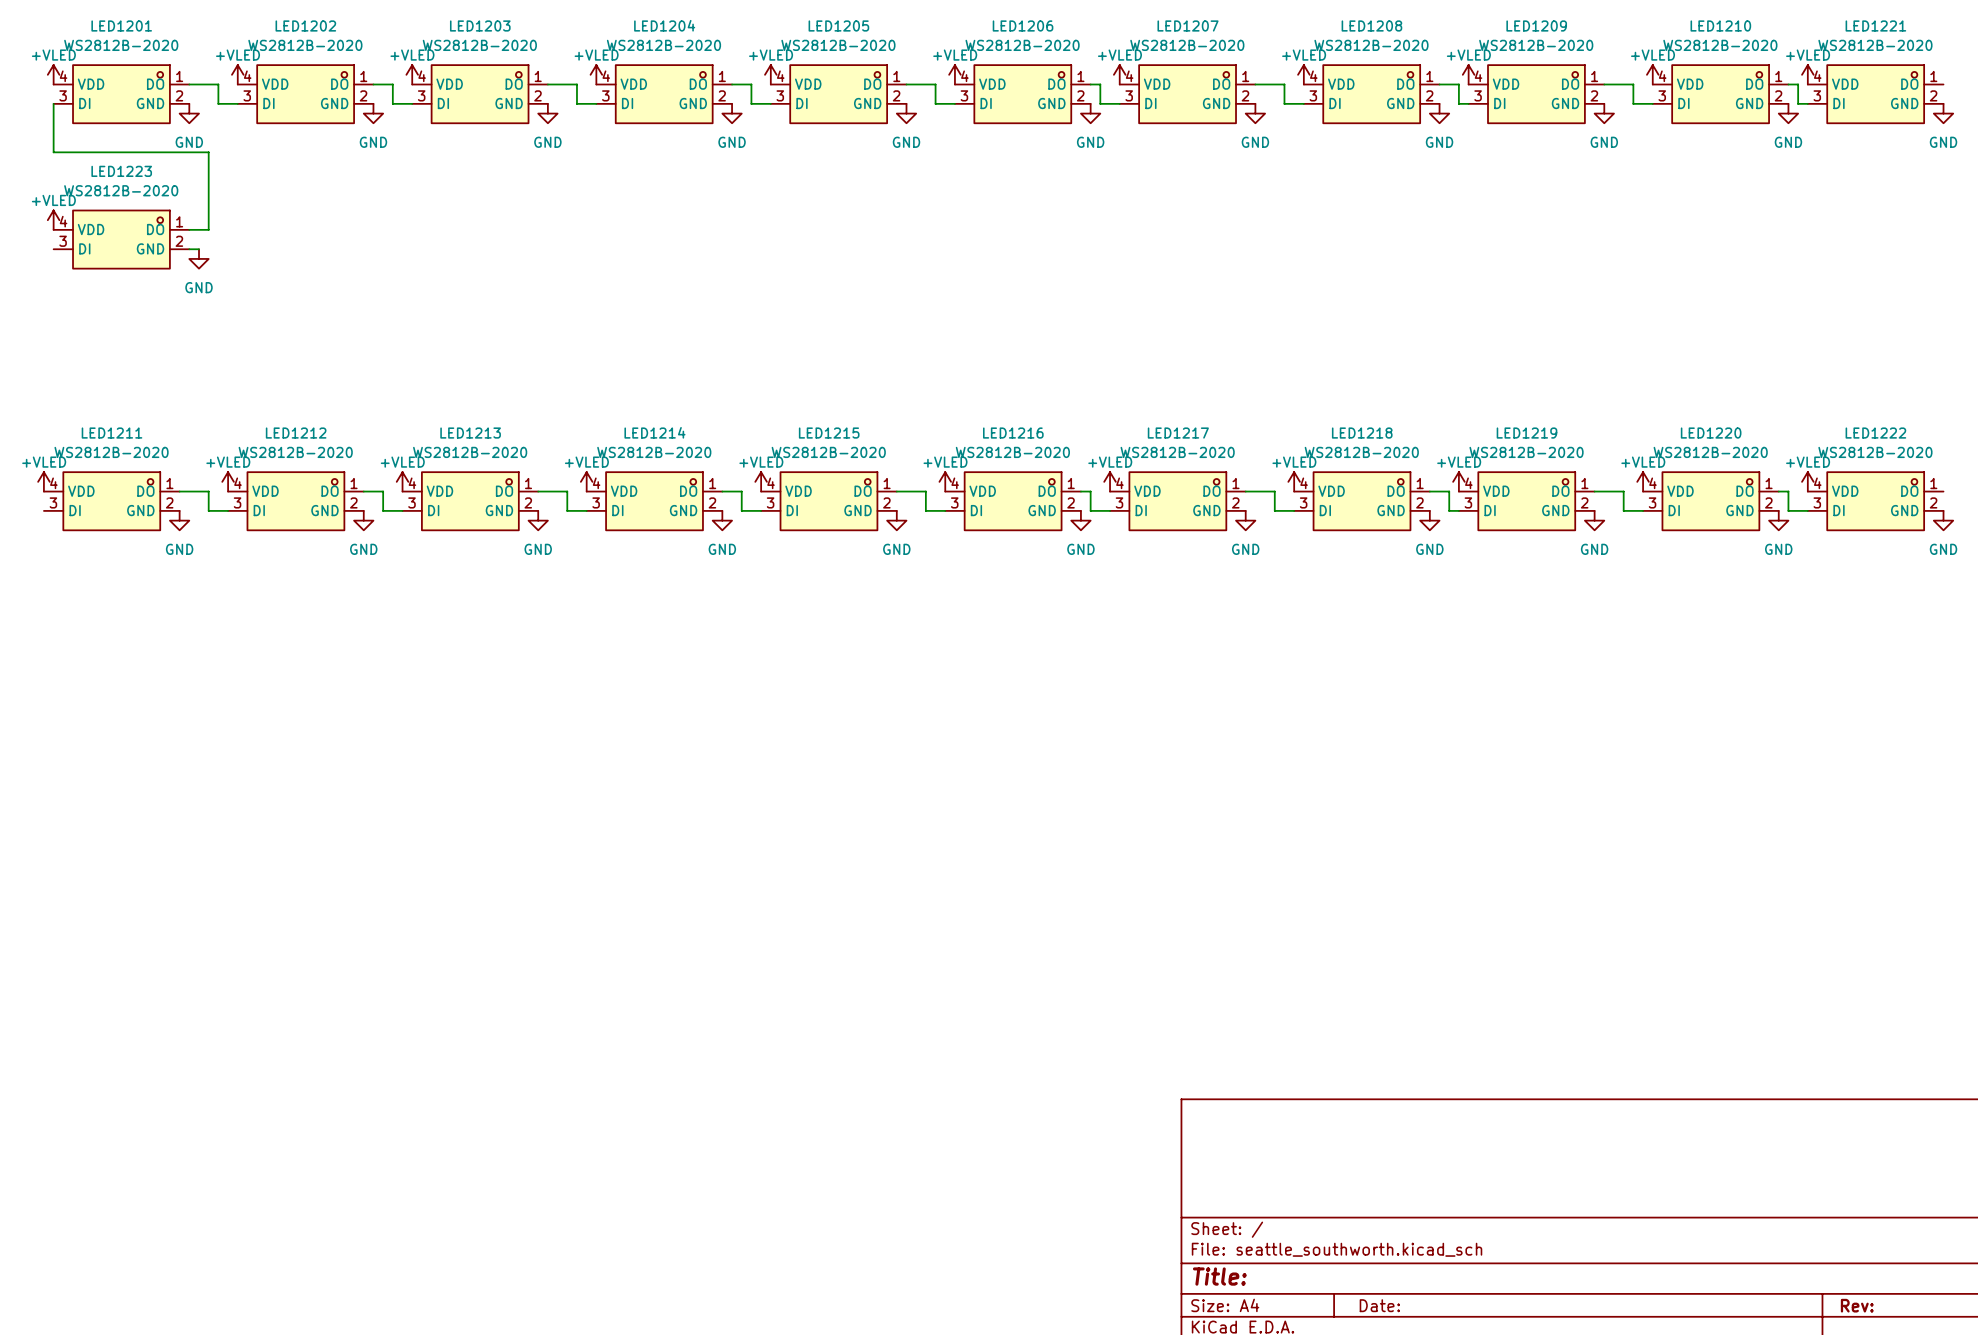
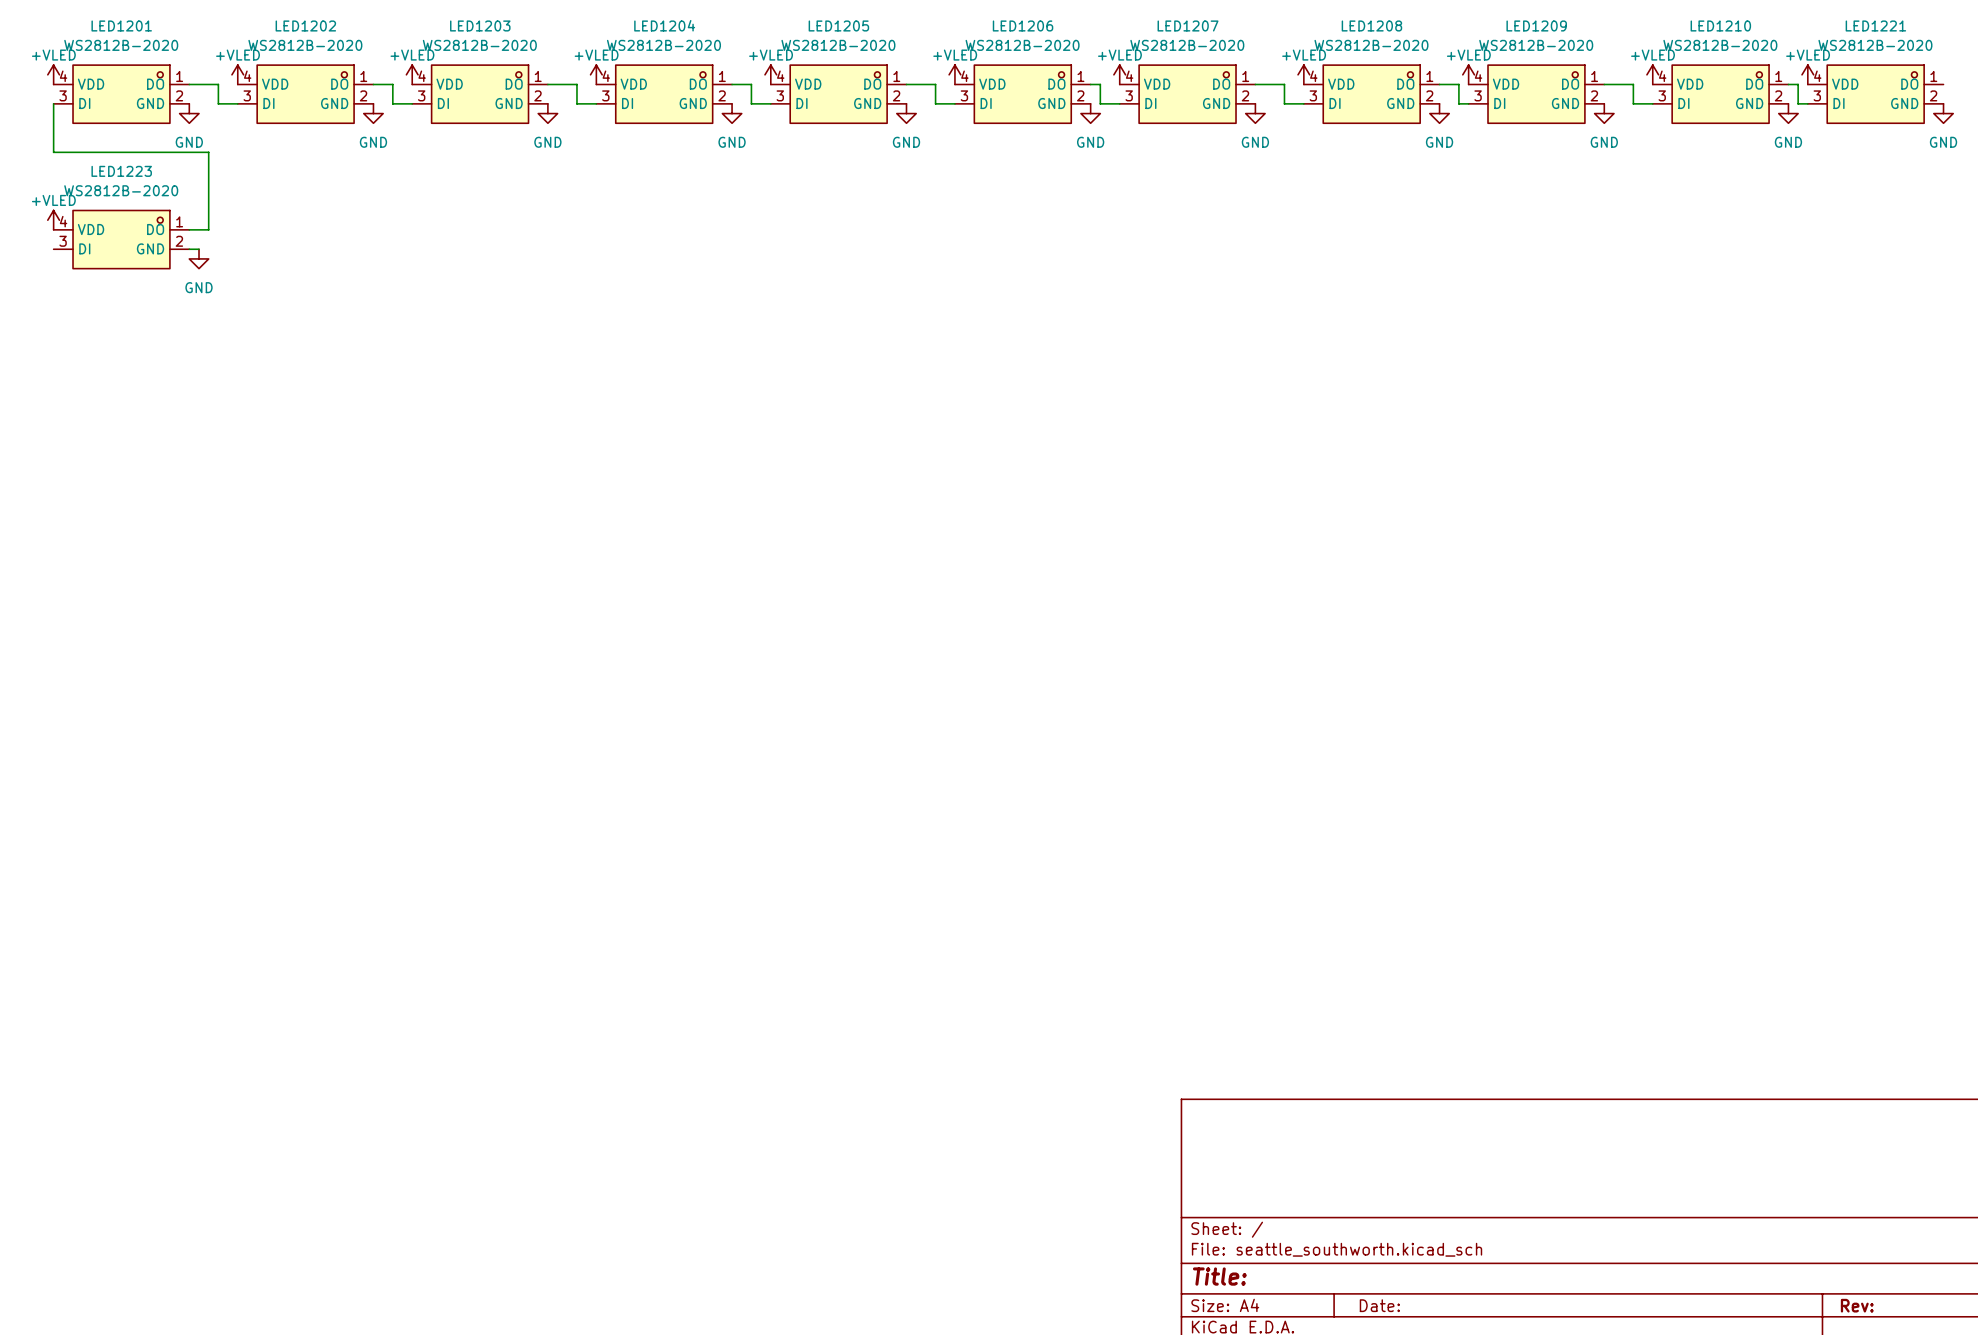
power symbol: +VLED (43, 481) -> none
power symbol: +VLED (228, 481) -> none
power symbol: +VLED (402, 481) -> none
power symbol: +VLED (586, 481) -> none
power symbol: +VLED (761, 481) -> none
power symbol: +VLED (945, 481) -> none
power symbol: +VLED (1110, 481) -> none
power symbol: +VLED (1294, 481) -> none
power symbol: +VLED (1458, 481) -> none
power symbol: +VLED (1643, 481) -> none
power symbol: +VLED (1807, 481) -> none
wire: (179, 491) (208, 491) (208, 510) (228, 510) -> none
wire: (363, 491) (383, 491) (383, 510) (402, 510) -> none
wire: (538, 491) (567, 491) (567, 510) (586, 510) -> none
wire: (722, 491) (741, 491) (741, 510) (761, 510) -> none
wire: (896, 491) (925, 491) (925, 510) (945, 510) -> none
wire: (1080, 491) (1090, 491) (1090, 510) (1110, 510) -> none
wire: (1245, 491) (1274, 491) (1274, 510) (1294, 510) -> none
wire: (1429, 491) (1449, 491) (1449, 510) (1458, 510) -> none
wire: (1594, 491) (1623, 491) (1623, 510) (1643, 510) -> none
wire: (1778, 491) (1788, 491) (1788, 510) (1807, 510) -> none
LED1211: WS2812B-2020 (111, 501) -> none
LED1212: WS2812B-2020 (295, 501) -> none
LED1213: WS2812B-2020 (470, 501) -> none
LED1214: WS2812B-2020 (654, 501) -> none
LED1215: WS2812B-2020 (828, 501) -> none
LED1216: WS2812B-2020 (1013, 501) -> none
LED1217: WS2812B-2020 (1177, 501) -> none
LED1218: WS2812B-2020 (1362, 501) -> none
LED1219: WS2812B-2020 (1526, 501) -> none
LED1220: WS2812B-2020 (1710, 501) -> none
LED1222: WS2812B-2020 (1875, 501) -> none
power symbol: GND (179, 520) -> none
power symbol: GND (363, 520) -> none
power symbol: GND (538, 520) -> none
power symbol: GND (722, 520) -> none
power symbol: GND (896, 520) -> none
power symbol: GND (1080, 520) -> none
power symbol: GND (1245, 520) -> none
power symbol: GND (1429, 520) -> none
power symbol: GND (1594, 520) -> none
power symbol: GND (1778, 520) -> none
power symbol: GND (1943, 520) -> none

